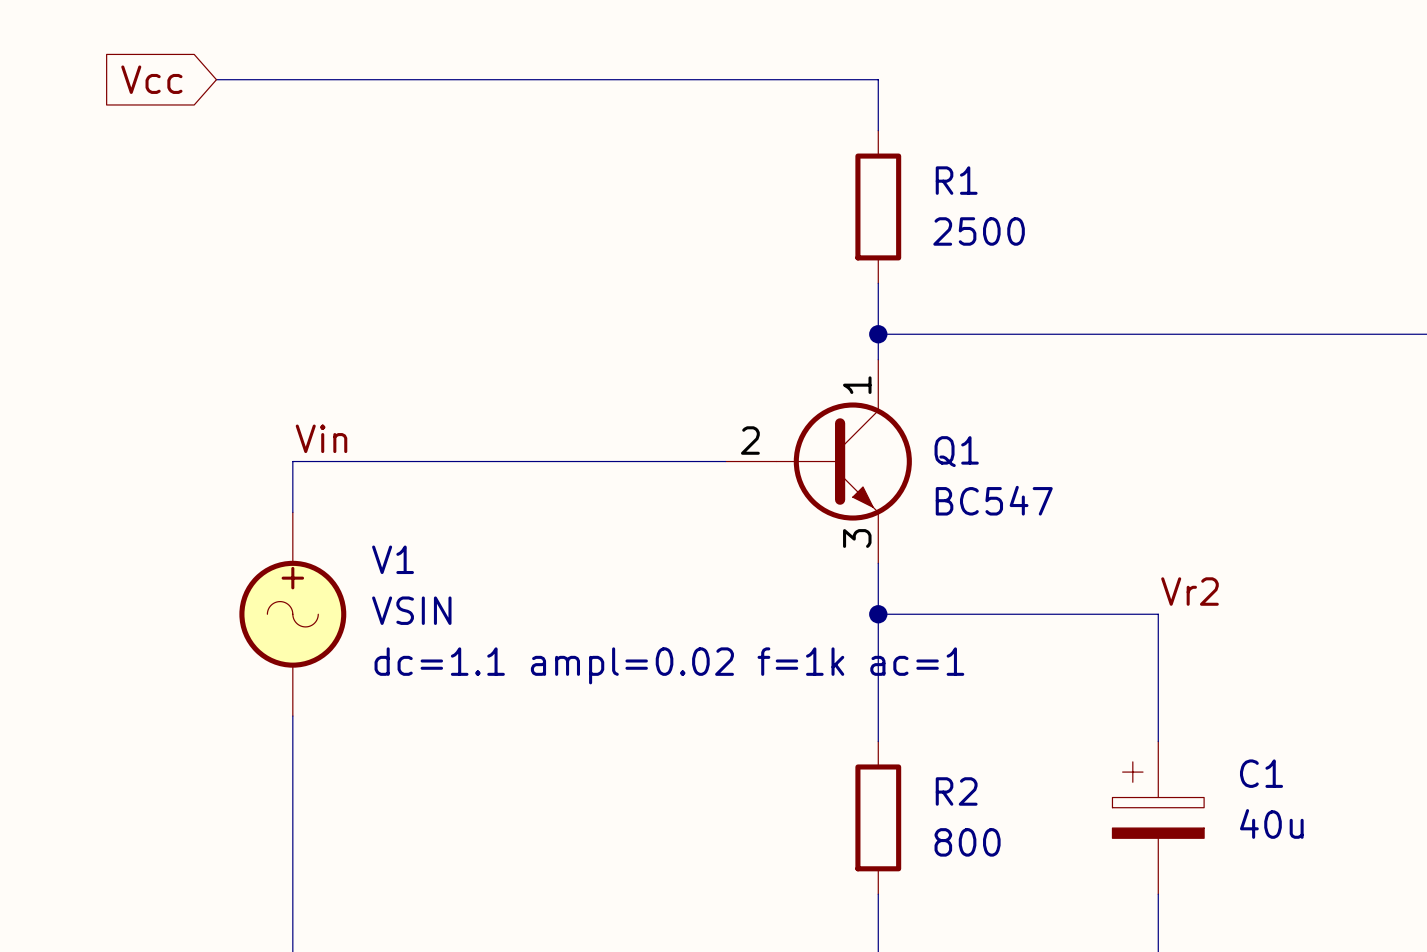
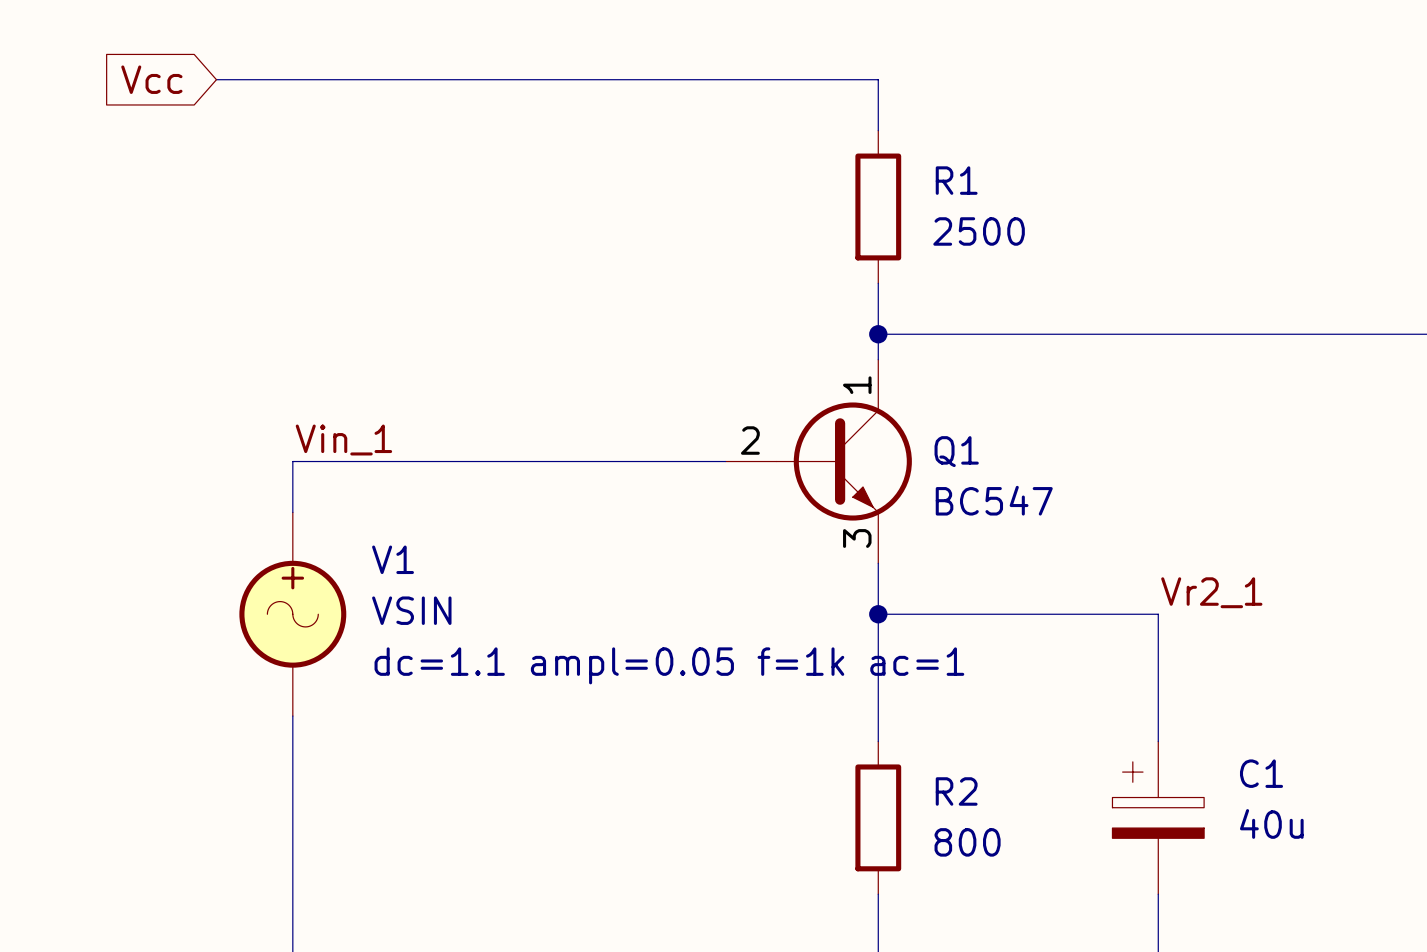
label: Vin (321, 438) -> Vin_1 (343, 440)
label: Vr2 (1189, 591) -> Vr2_1 (1211, 592)
V1 text: dc=1.1 ampl=0.02 f=1k ac=1 (669, 665) -> dc=1.1 ampl=0.05 f=1k ac=1 (669, 665)

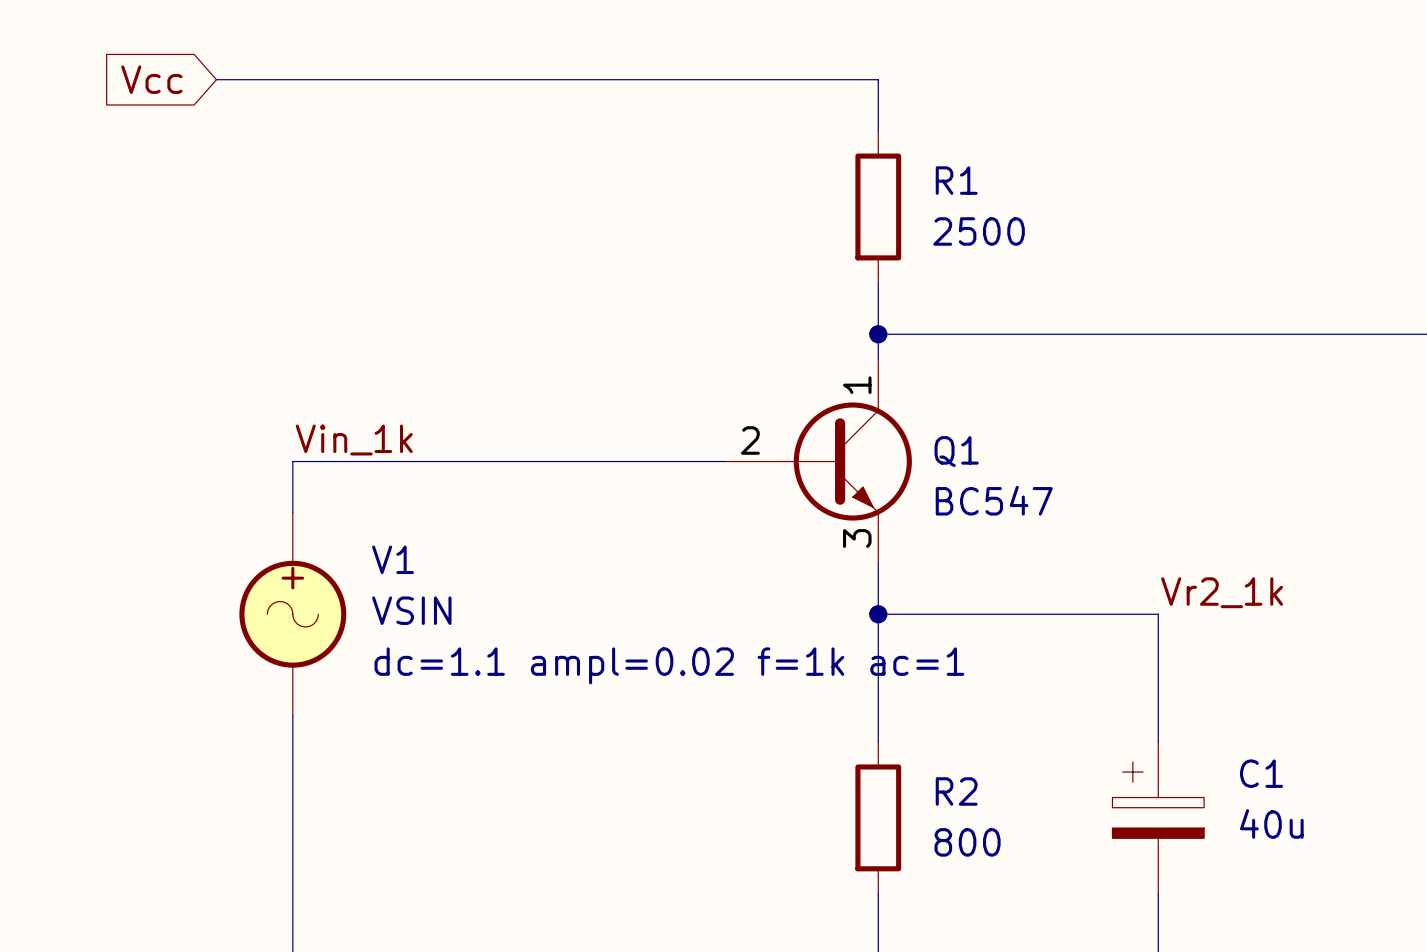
label: Vin_1 (343, 440) -> Vin_1k (354, 440)
label: Vr2_1 (1211, 592) -> Vr2_1k (1222, 592)
V1 text: dc=1.1 ampl=0.05 f=1k ac=1 (669, 665) -> dc=1.1 ampl=0.02 f=1k ac=1 (669, 665)

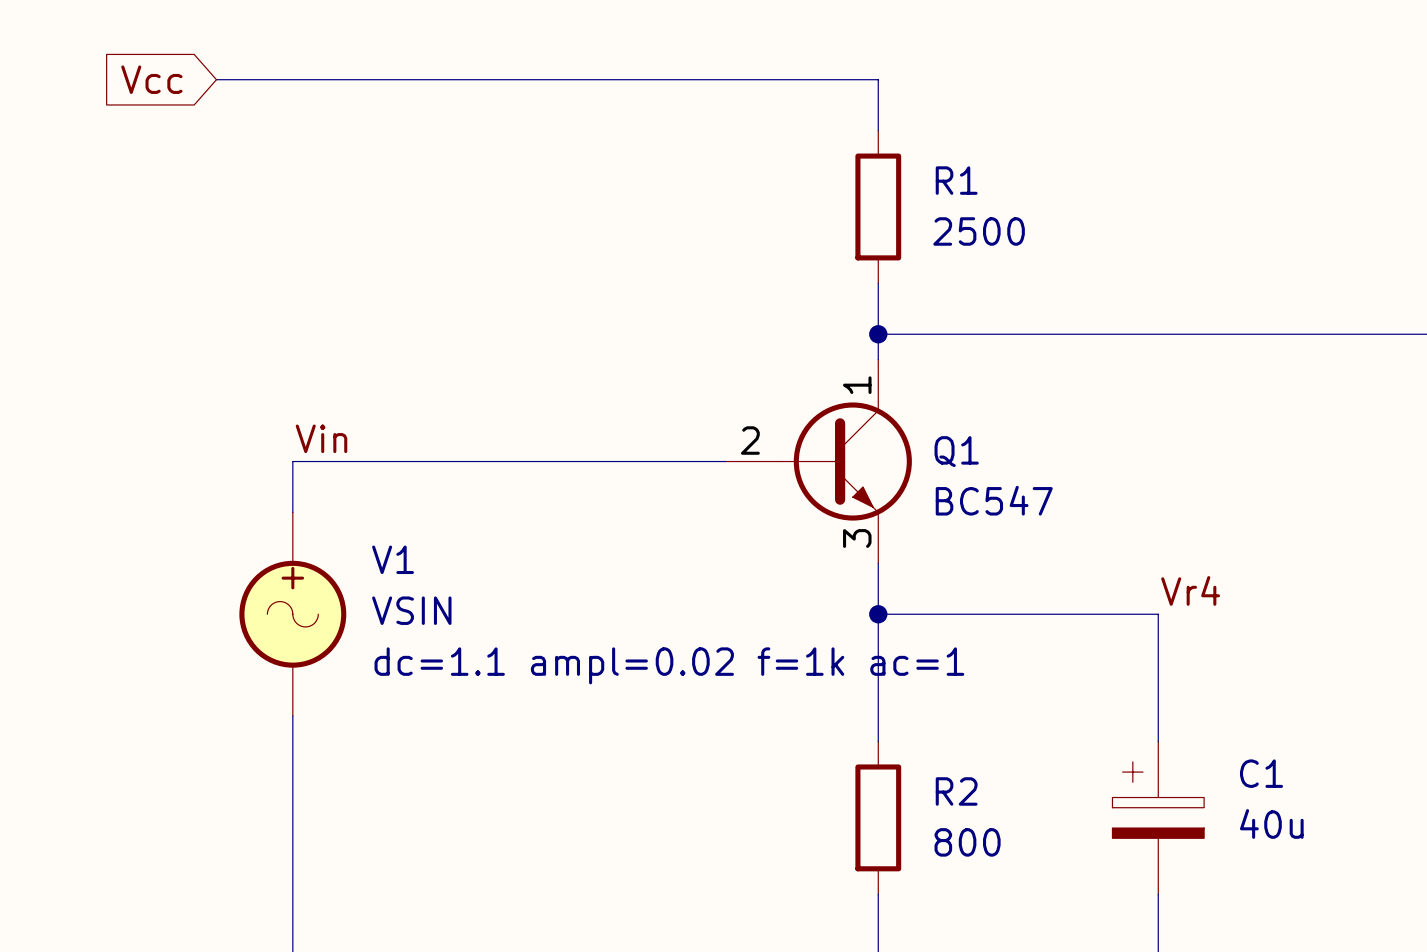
label: Vin_1k (354, 440) -> Vin (321, 438)
label: Vr2_1k (1222, 592) -> Vr4 (1190, 590)

